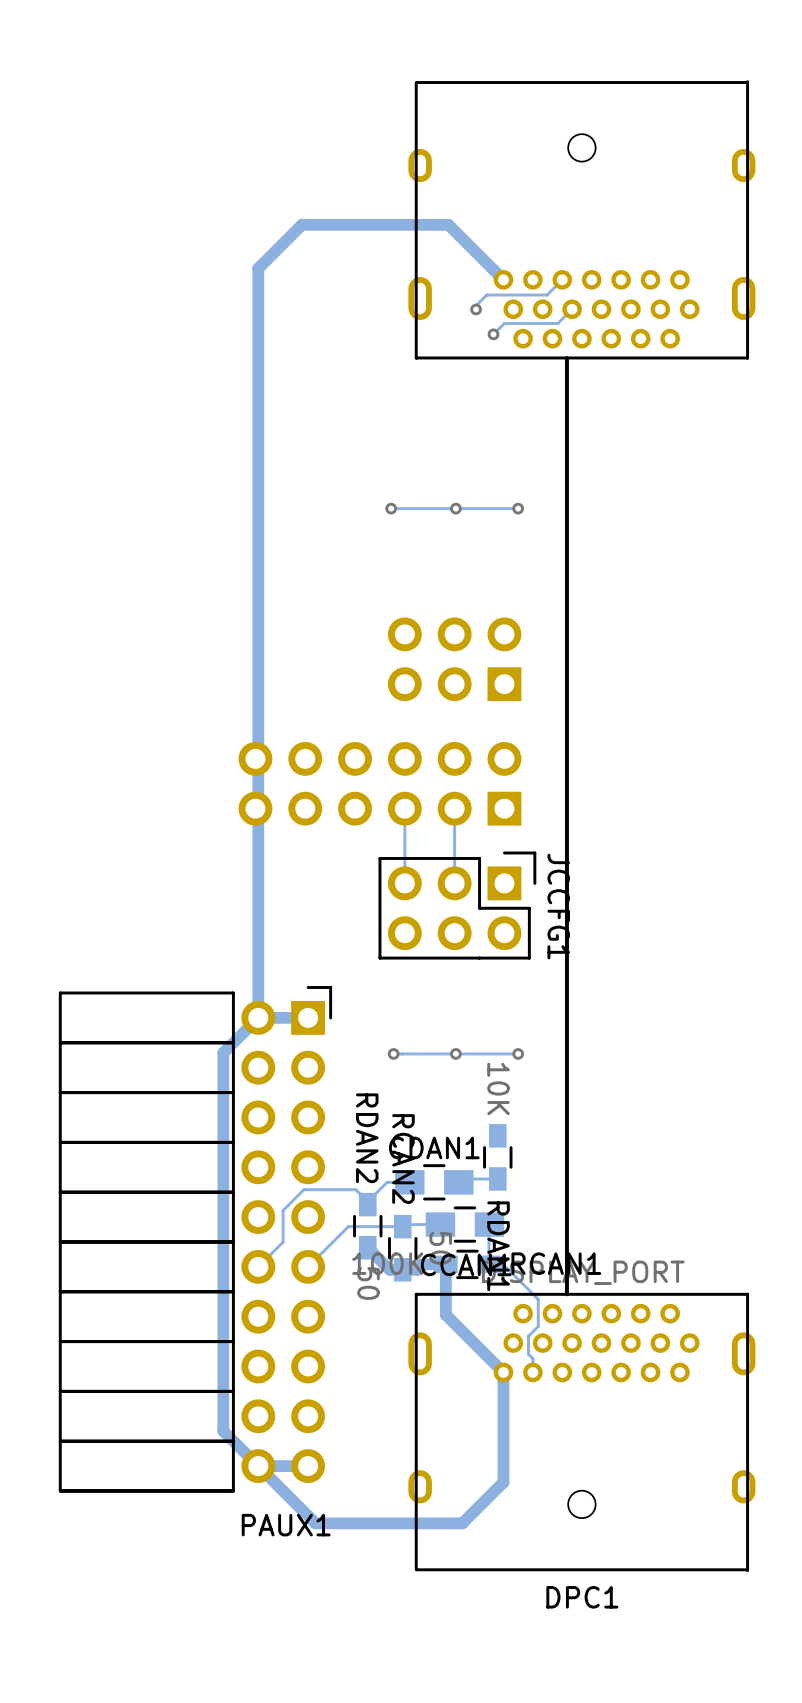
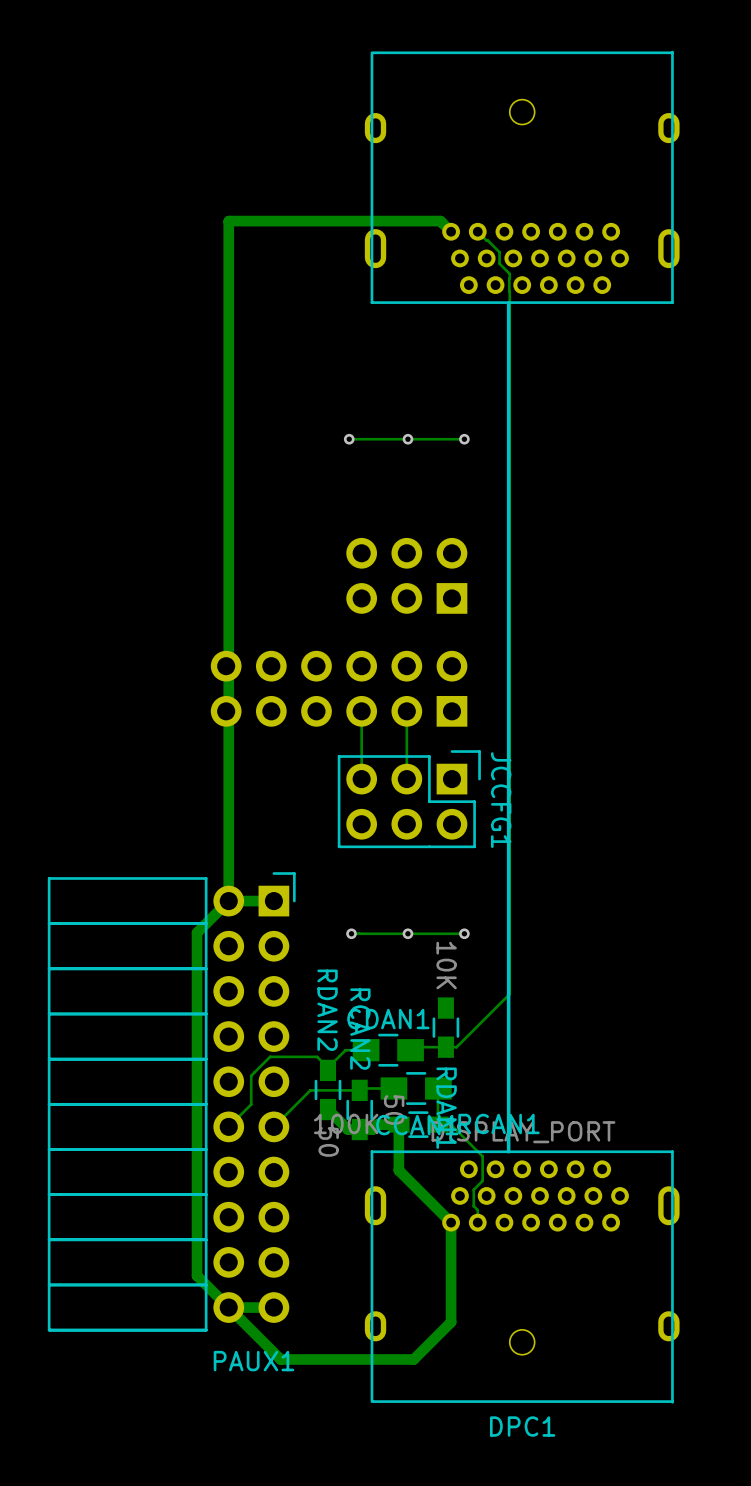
track: (491, 268) (448, 224) (301, 224) (258, 268) -> (440, 221) (229, 221)
track: none -> (477, 231) (499, 252) (499, 263) (509, 273) (509, 994) (456, 1047) (445, 1047)
track: (562, 279) (547, 295) (486, 295) (476, 305) (476, 309) -> none
via: (476, 309) -> none
track: (572, 309) (557, 323) (504, 323) (493, 334) -> none
via: (493, 334) -> none

